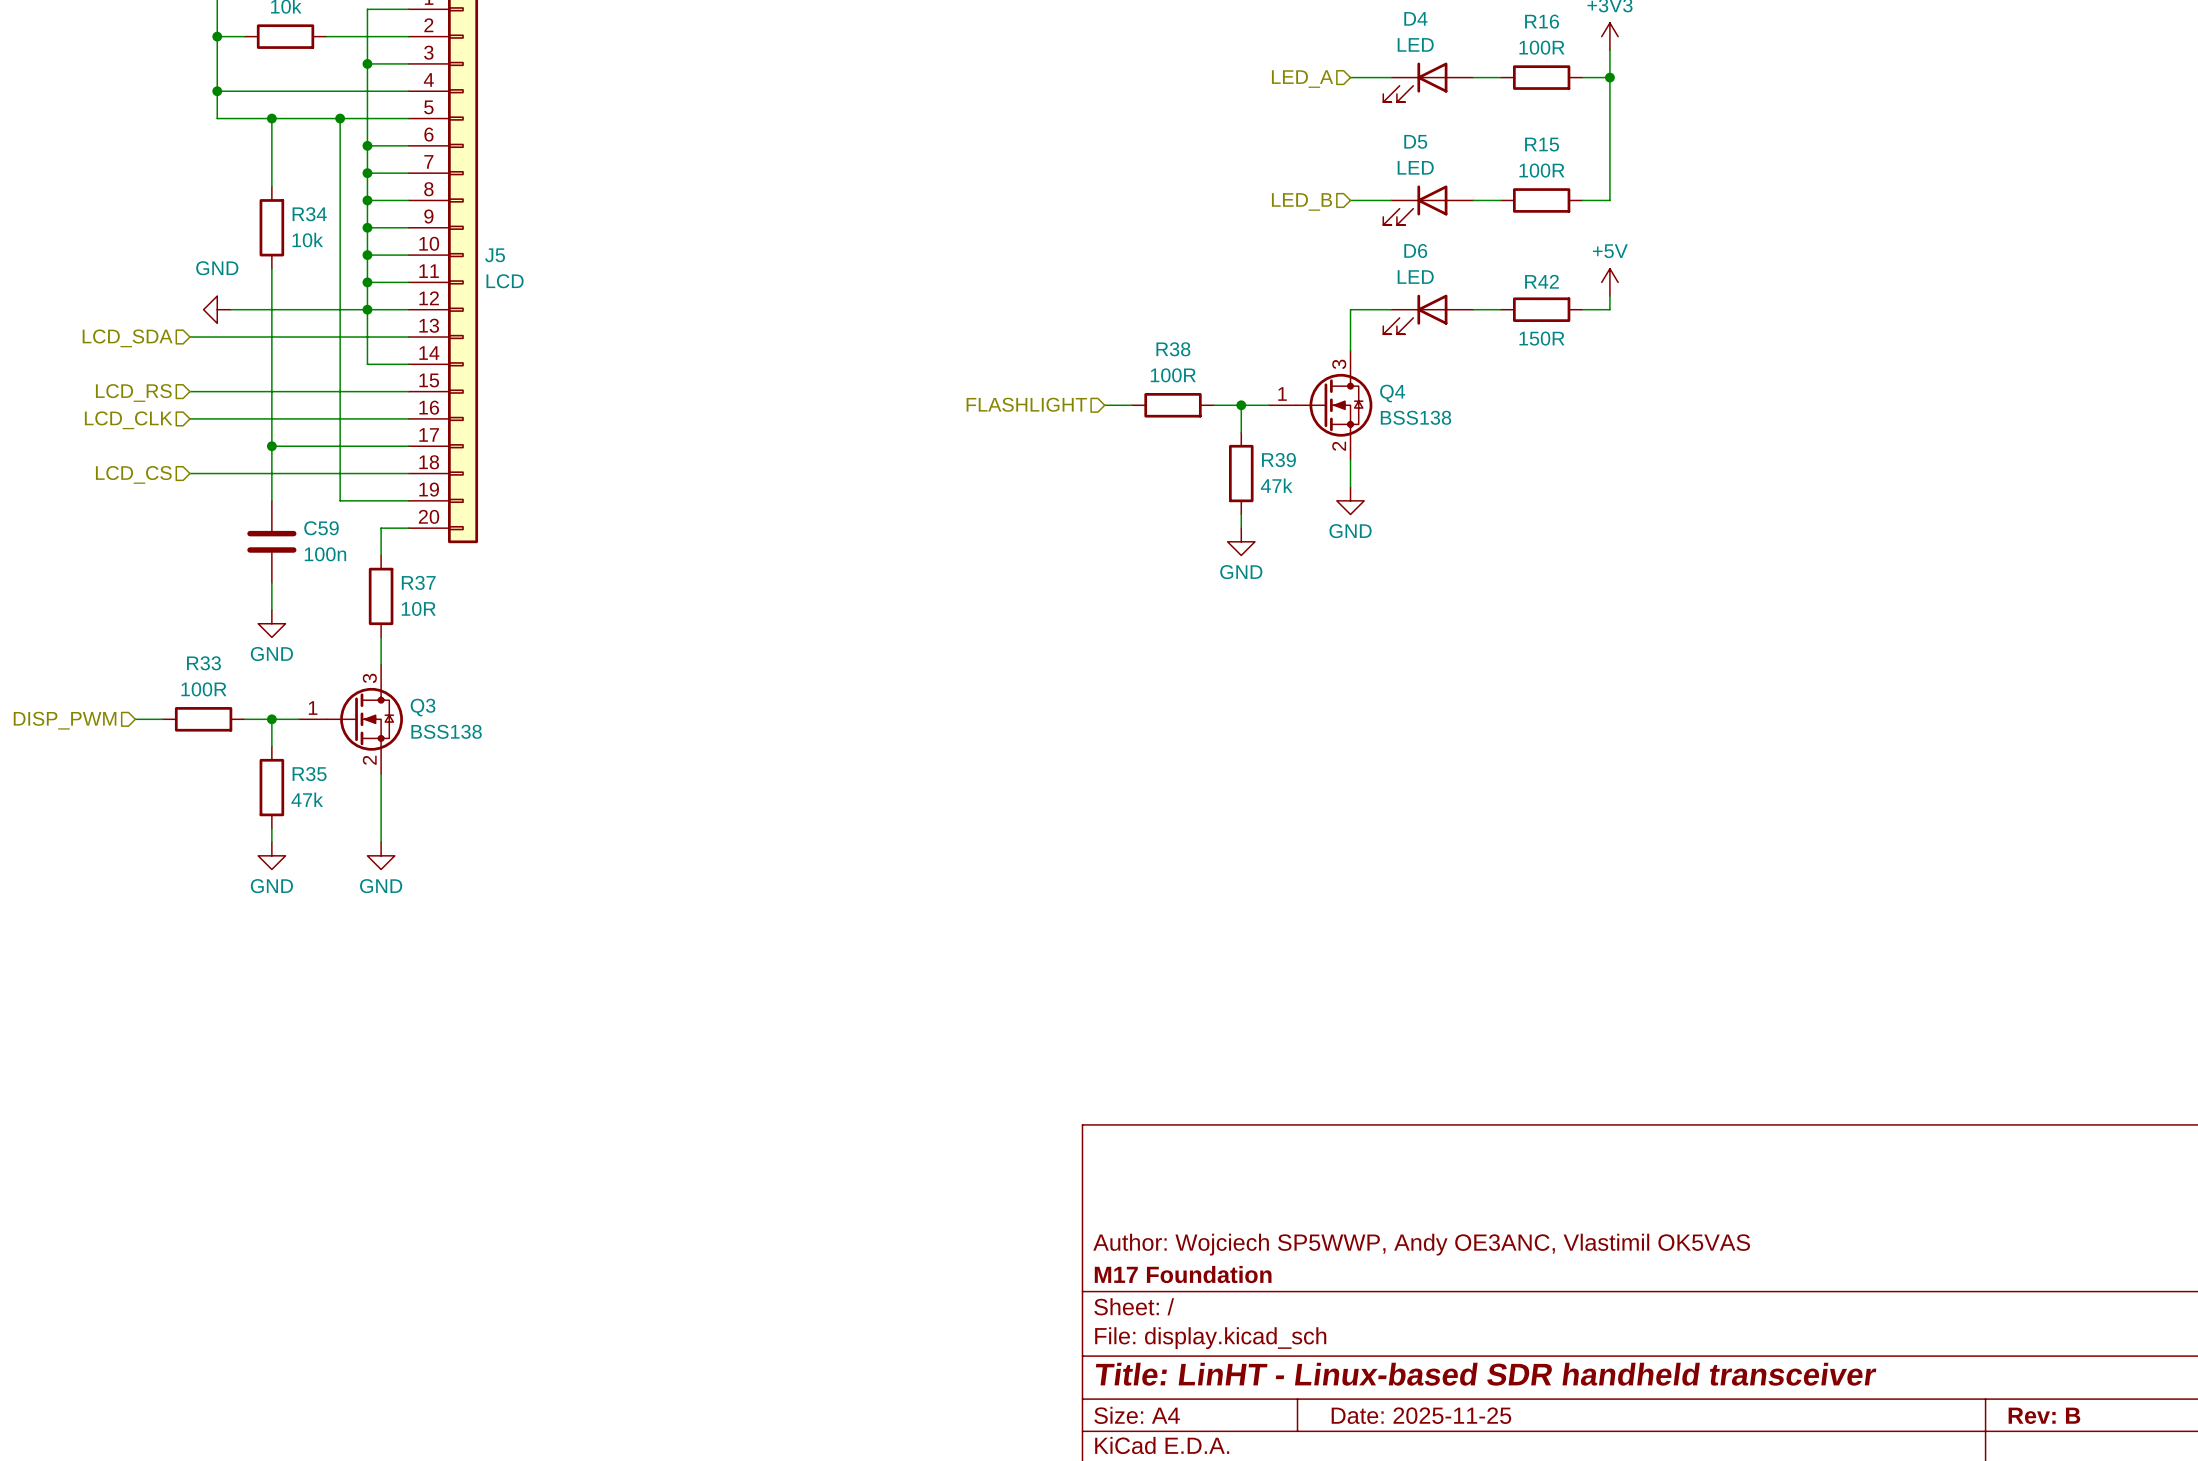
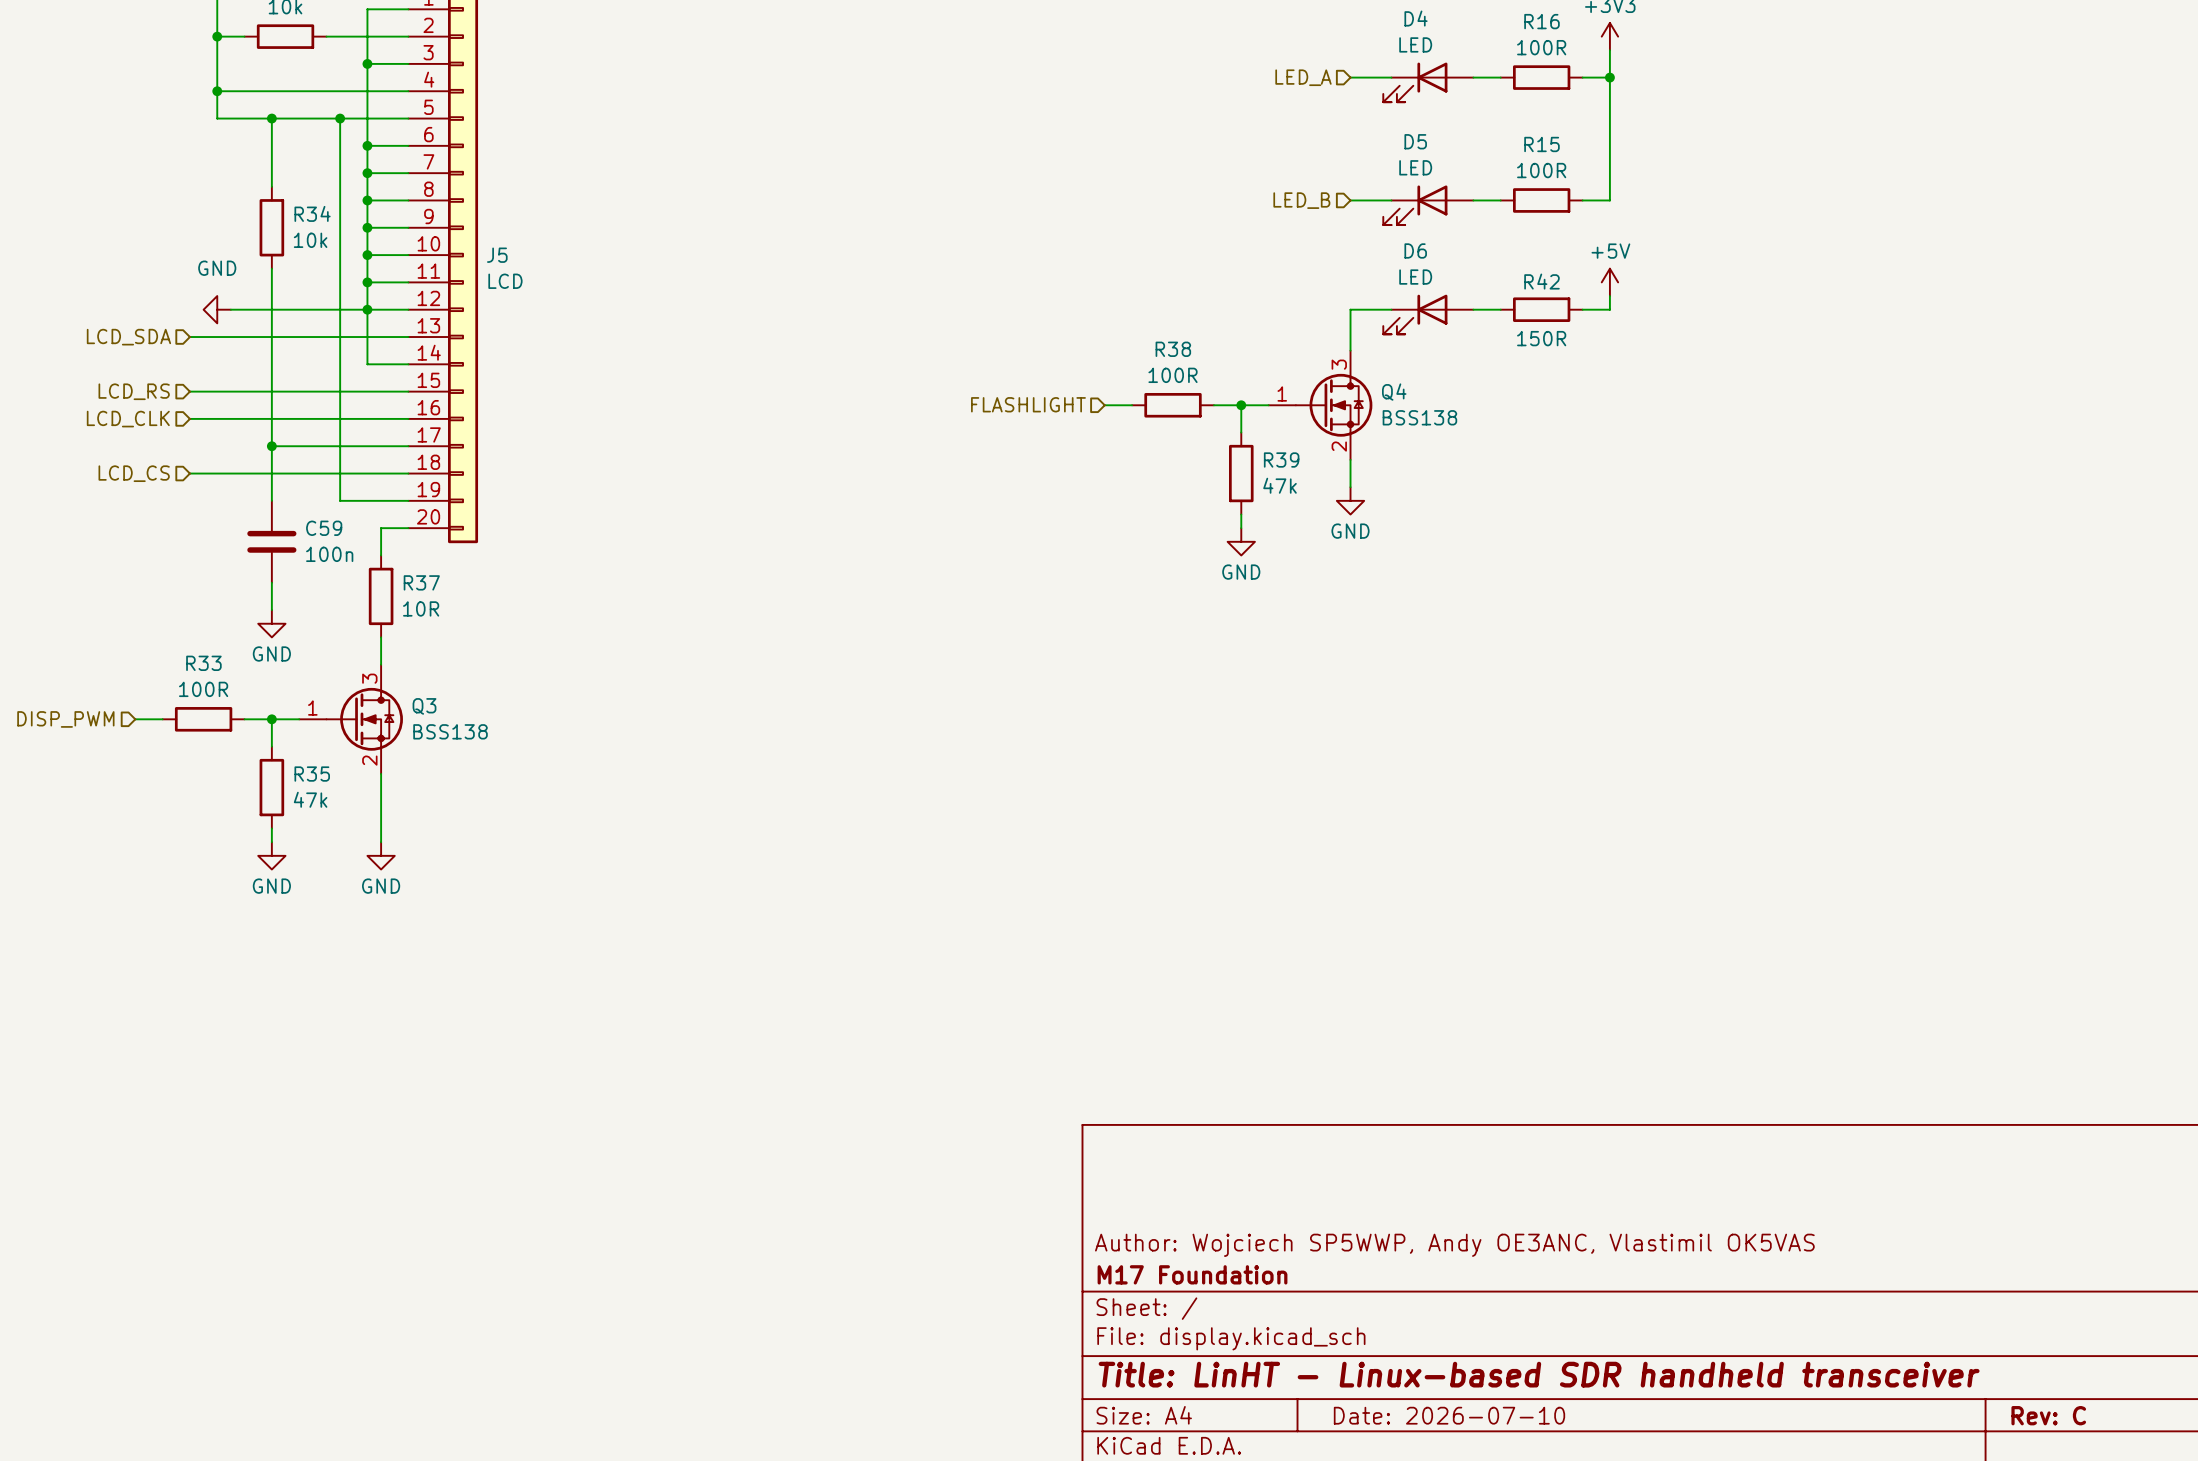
title block: Date: 2025-11-25 (1421, 1415) -> Date: 2026-07-10 (1449, 1415)
title block: Rev: B (2044, 1415) -> Rev: C (2048, 1415)

